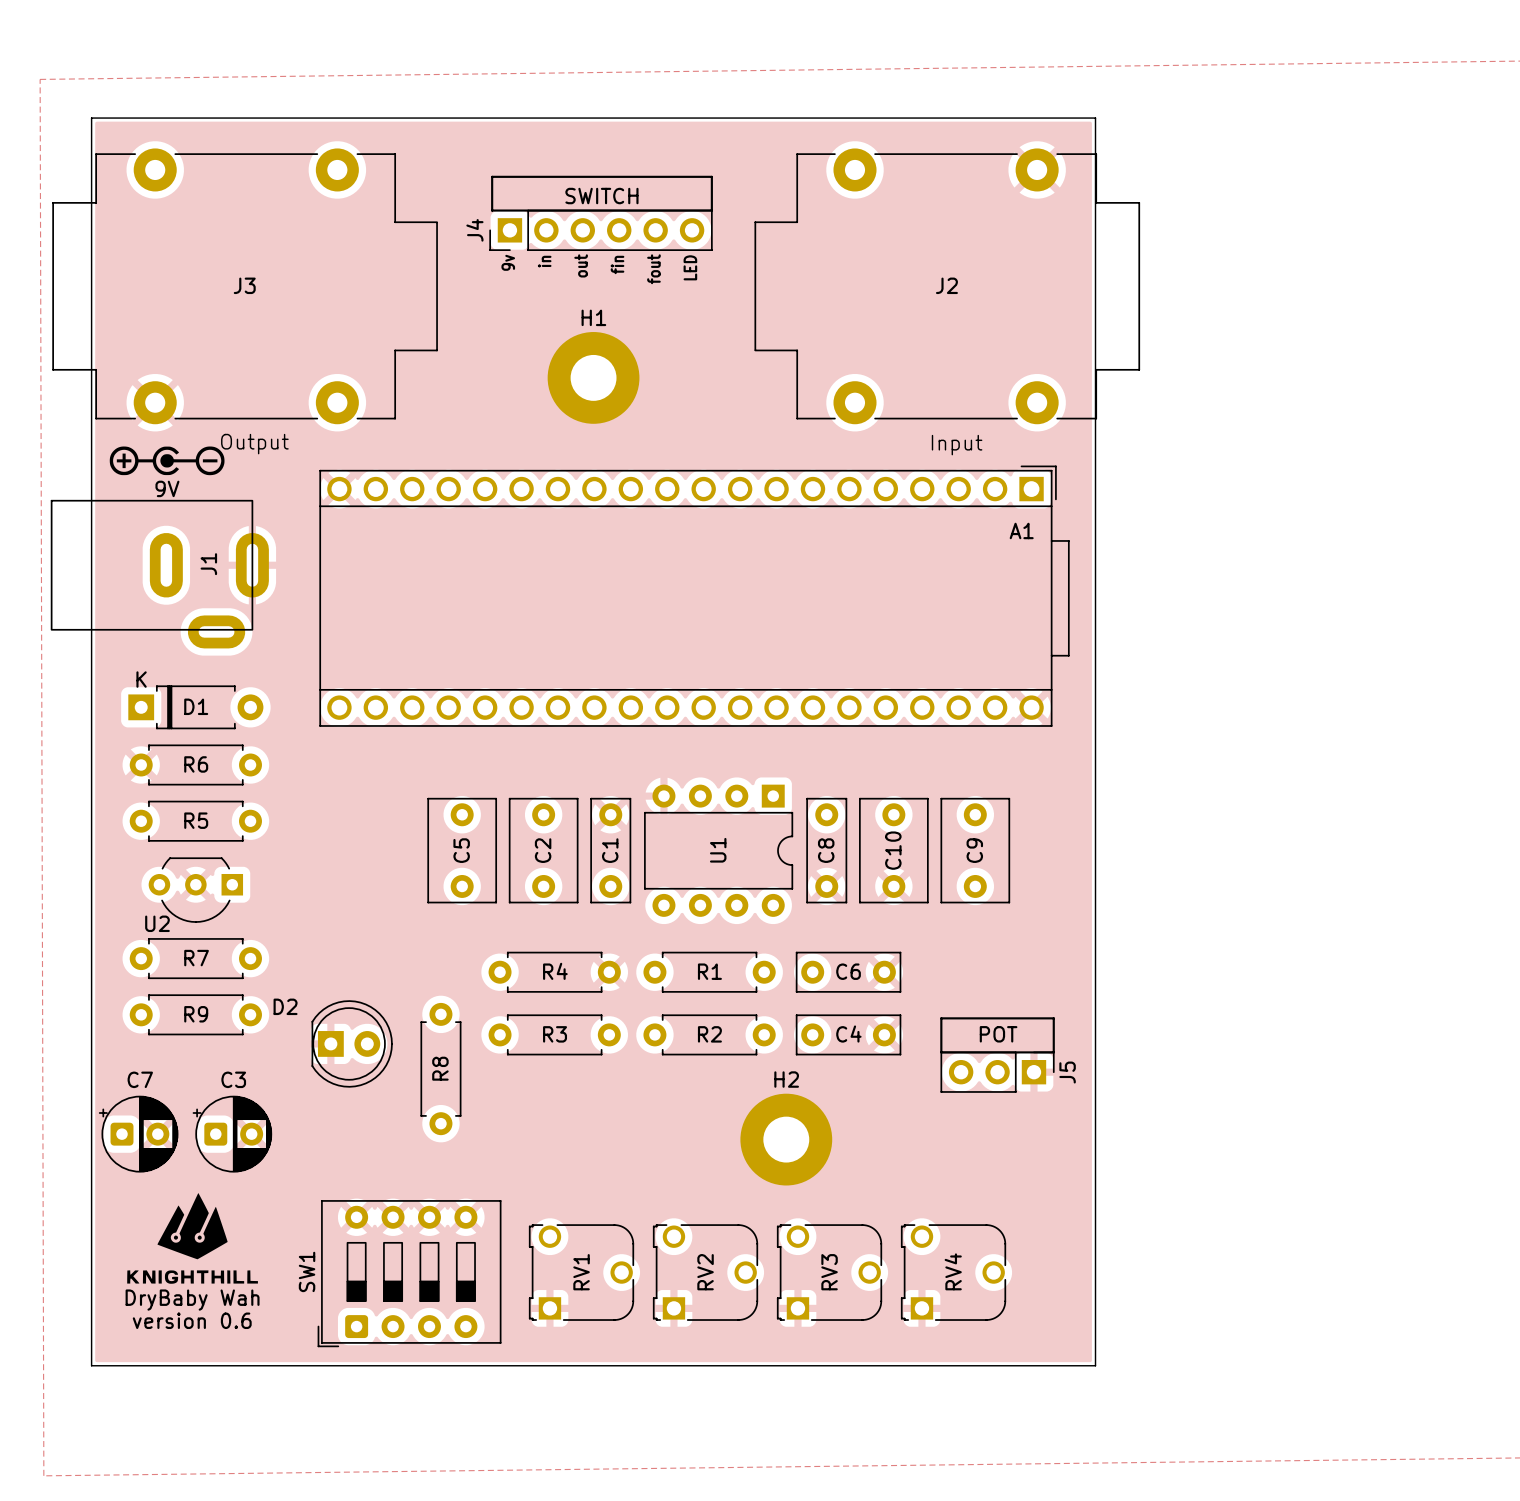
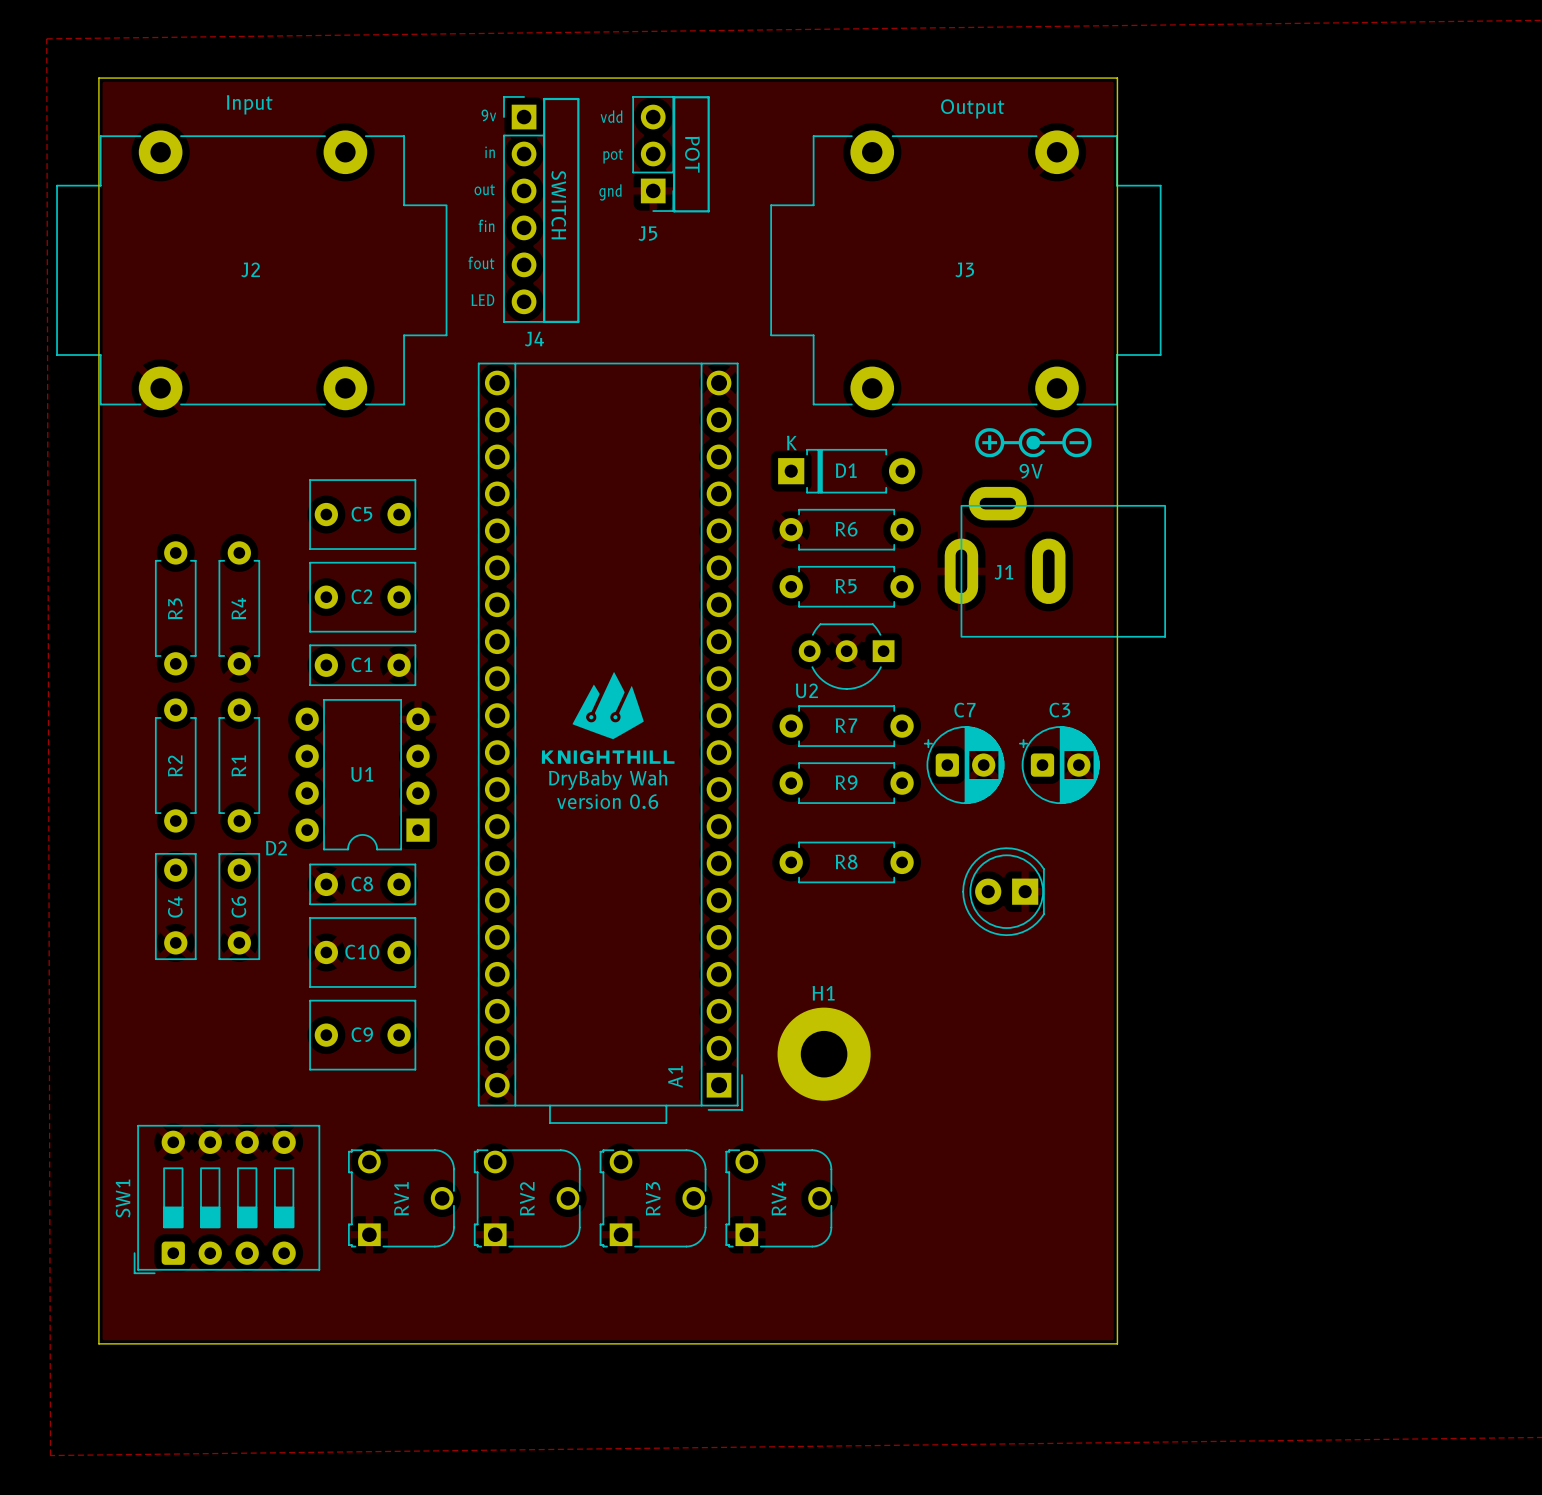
line: none -> (674, 97) (674, 211) (708, 211) (708, 97) (674, 97)
line: none -> (544, 99) (544, 321) (578, 321) (578, 99) (544, 99)
text: none -> Input (249, 104)
text: none -> Output (972, 108)
text: none -> vdd (611, 116)
line: (492, 176) (711, 176) (711, 210) (492, 210) (492, 176) -> none
text: none -> pot (613, 156)
text: none -> POT (692, 154)
text rotation: 0° (601, 196) -> 90° clockwise (558, 205)
J4 name position: J4 (474, 230) -> J4 (534, 339)
J4 rotation: 0° (601, 230) -> 90° clockwise (524, 209)
text: none -> gnd (610, 192)
text rotation: 0° (544, 261) -> 90° clockwise (490, 152)
text position: in (544, 261) -> in (490, 152)
text rotation: 0° (508, 262) -> 90° clockwise (488, 115)
text position: 9v (508, 262) -> 9v (488, 115)
text rotation: 0° (617, 264) -> 90° clockwise (486, 225)
text position: fin (617, 264) -> fin (486, 225)
text rotation: 0° (581, 265) -> 90° clockwise (484, 189)
text position: out (581, 265) -> out (484, 189)
text rotation: 0° (690, 267) -> 90° clockwise (482, 300)
text position: LED (690, 267) -> LED (482, 300)
text rotation: 0° (653, 269) -> 90° clockwise (481, 262)
text position: fout (653, 269) -> fout (481, 262)
J3 rotation: 0° (245, 286) -> 180° (965, 270)
J3 position: (245, 286) -> (965, 270)
J2 rotation: 0° (947, 286) -> 180° (251, 270)
J2 position: (947, 286) -> (251, 270)
H1 position: (593, 377) -> (824, 1054)
text: Output (254, 444) -> none
text: Input (957, 445) -> none
drawing: [109, 446, 225, 476] -> none
drawing: none -> [975, 428, 1092, 458]
text: 9V (167, 488) -> none
text: none -> 9V (1031, 471)
J1 rotation: 0° (159, 574) -> 180° (1055, 562)
J1 position: (159, 574) -> (1055, 562)
A1 rotation: 0° (694, 596) -> 90° clockwise (610, 743)
drawing: none -> [541, 671, 675, 764]
D1 position: (195, 707) -> (846, 471)
R6 position: (195, 764) -> (846, 529)
text: none -> DryBaby Wah (608, 779)
R5 position: (195, 821) -> (846, 586)
text: none -> version 0.6 (607, 801)
C5 rotation: 0° (462, 850) -> 90° clockwise (362, 514)
C5 position: (462, 850) -> (362, 514)
C2 rotation: 0° (543, 850) -> 90° clockwise (362, 597)
C2 position: (543, 850) -> (362, 597)
C1 rotation: 0° (610, 850) -> 90° clockwise (362, 665)
C1 position: (610, 850) -> (362, 665)
U1 rotation: 0° (718, 850) -> 90° clockwise (362, 774)
U1 position: (718, 850) -> (362, 774)
C8 rotation: 0° (826, 850) -> 90° clockwise (362, 884)
C8 position: (826, 850) -> (362, 884)
C10 rotation: 0° (893, 850) -> 90° clockwise (362, 952)
C10 position: (893, 850) -> (362, 952)
C9 rotation: 0° (975, 850) -> 90° clockwise (362, 1035)
C9 position: (975, 850) -> (362, 1035)
U2 position: (195, 890) -> (846, 656)
R7 position: (195, 958) -> (846, 726)
R4 rotation: 0° (554, 972) -> 90° clockwise (239, 608)
R4 position: (554, 972) -> (239, 608)
R1 rotation: 0° (709, 972) -> 90° clockwise (239, 765)
R1 position: (709, 972) -> (239, 765)
C6 rotation: 0° (848, 972) -> 90° clockwise (239, 906)
C6 position: (848, 972) -> (239, 906)
D2 name position: D2 (285, 1006) -> D2 (276, 848)
R9 position: (195, 1014) -> (846, 783)
line: (941, 1018) (1053, 1018) (1053, 1052) (941, 1052) (941, 1018) -> none
R3 rotation: 0° (554, 1034) -> 90° clockwise (175, 608)
R3 position: (554, 1034) -> (175, 608)
R2 rotation: 0° (709, 1034) -> 90° clockwise (175, 765)
R2 position: (709, 1034) -> (175, 765)
C4 rotation: 0° (848, 1034) -> 90° clockwise (175, 906)
C4 position: (848, 1034) -> (175, 906)
text: POT (998, 1034) -> none
D2 rotation: 0° (352, 1043) -> 180° (1003, 891)
D2 position: (352, 1043) -> (1003, 891)
R8 rotation: 0° (440, 1069) -> 90° clockwise (846, 862)
R8 position: (440, 1069) -> (846, 862)
J5 rotation: 0° (997, 1072) -> 90° clockwise (653, 154)
J5 position: (997, 1072) -> (653, 154)
C7 position: (138, 1134) -> (964, 765)
C3 position: (232, 1134) -> (1059, 765)
H2: (786, 1139) -> none
drawing: [127, 1193, 258, 1284] -> none
RV1 position: (581, 1272) -> (401, 1198)
RV2 position: (705, 1272) -> (527, 1198)
RV3 position: (829, 1272) -> (653, 1198)
RV4 position: (953, 1272) -> (778, 1198)
SW1 position: (409, 1273) -> (226, 1199)
text: DryBaby Wah (192, 1300) -> none
text: version 0.6 (192, 1320) -> none

